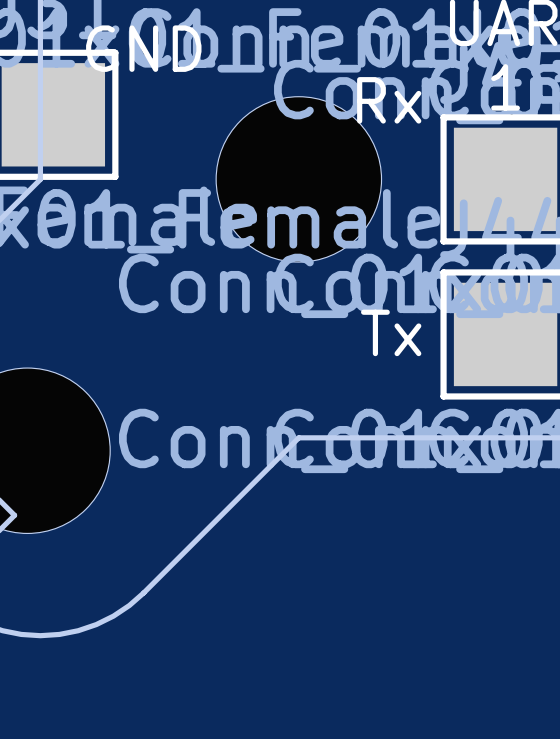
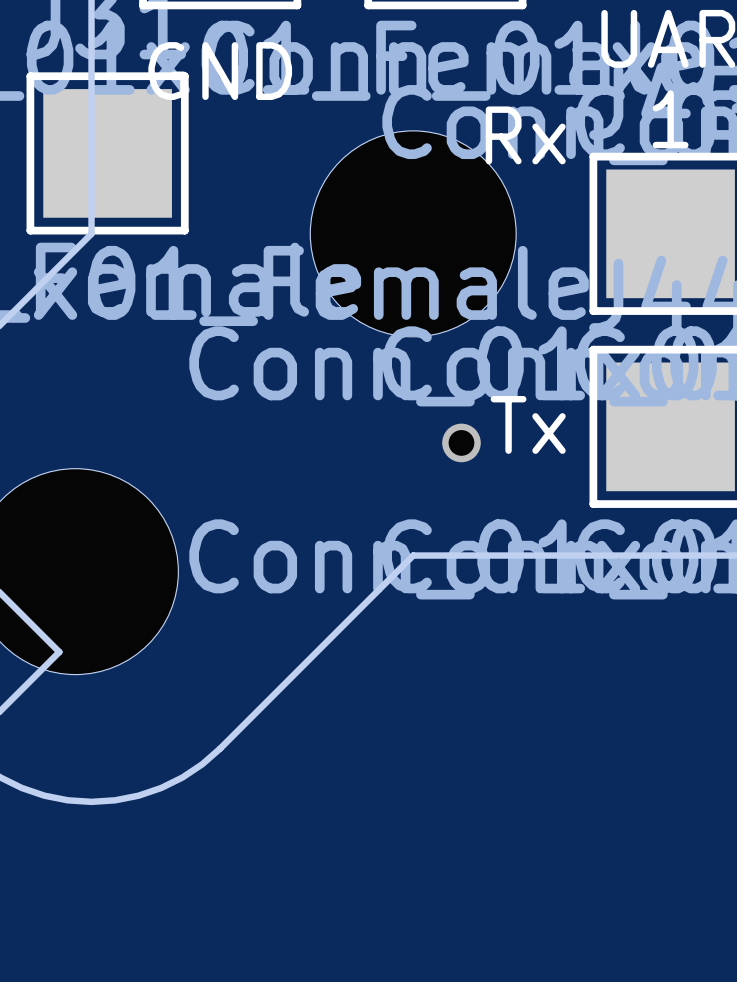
via: none -> (461, 442)

